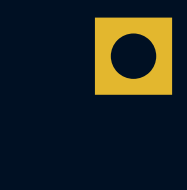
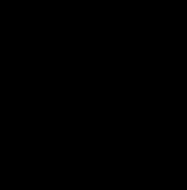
part: (133, 56) -> none

